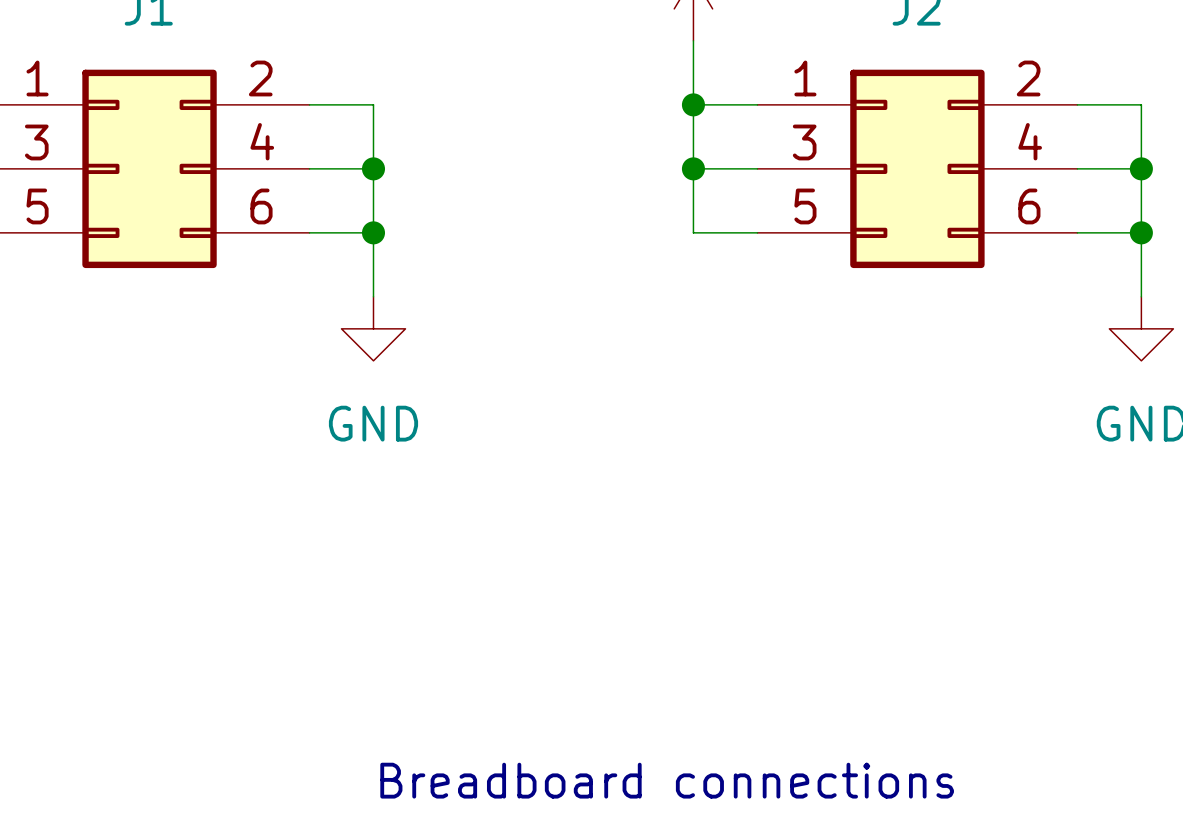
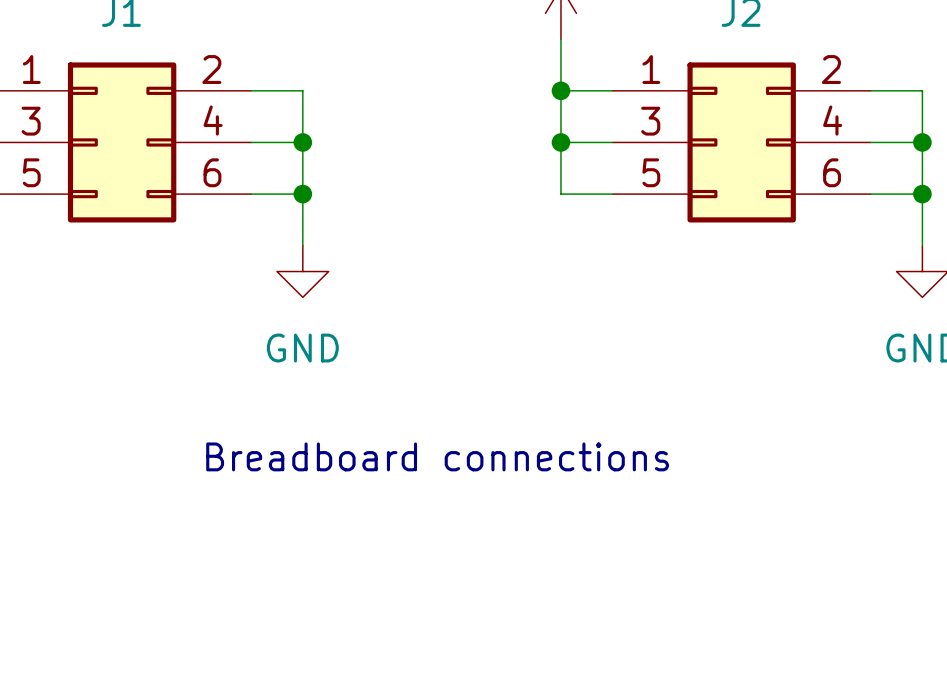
text position: Breadboard connections (667, 780) -> Breadboard connections (437, 456)

